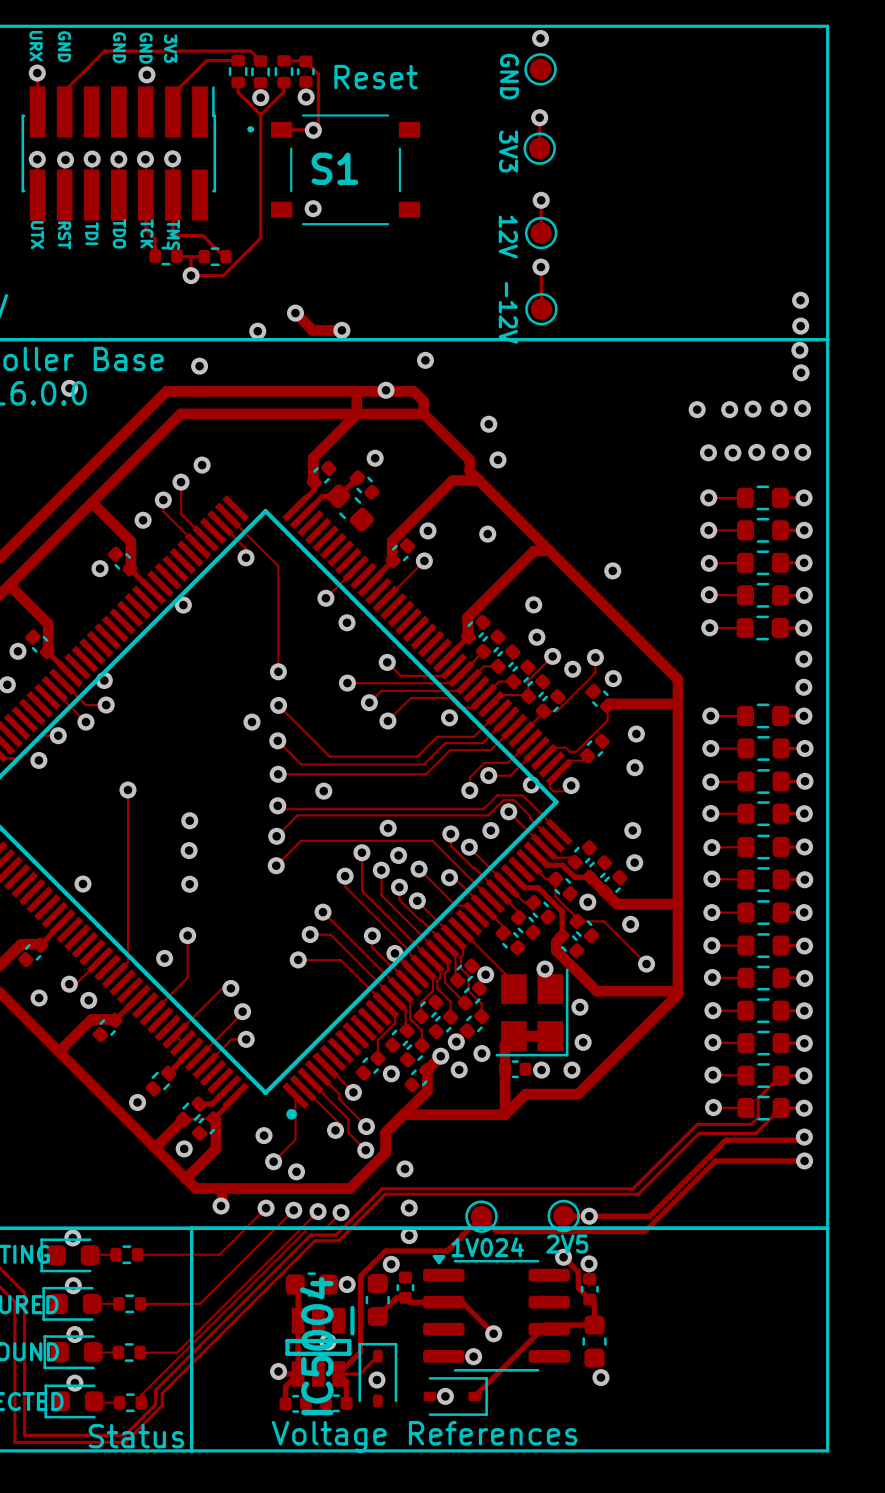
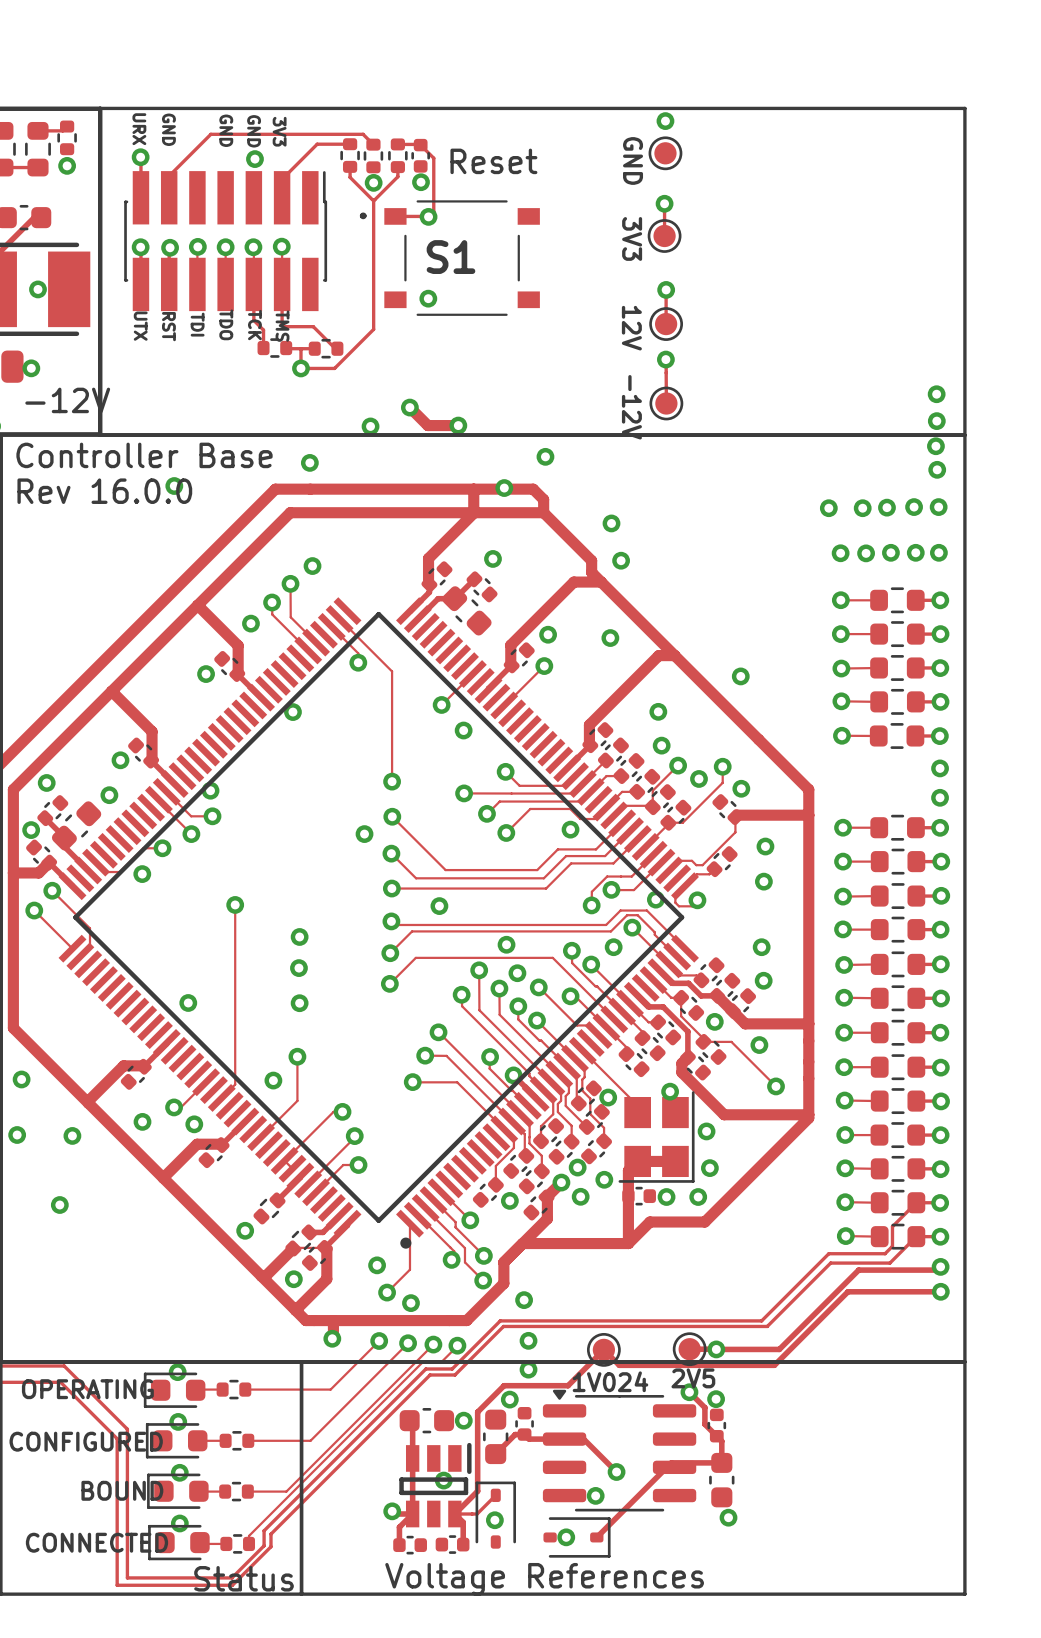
IC5004 name: IC5004 (316, 1346) -> none

